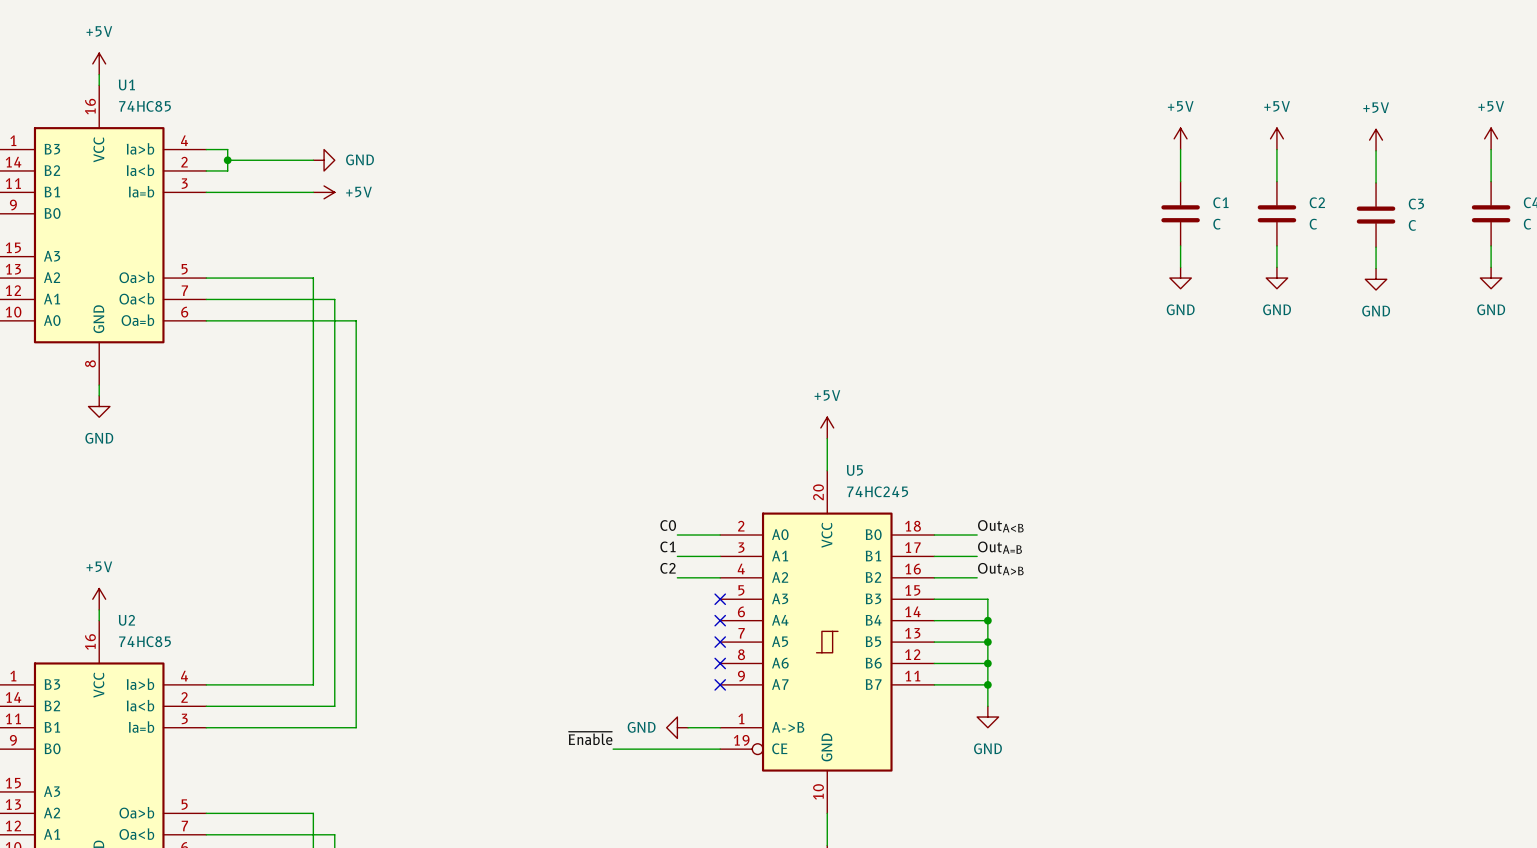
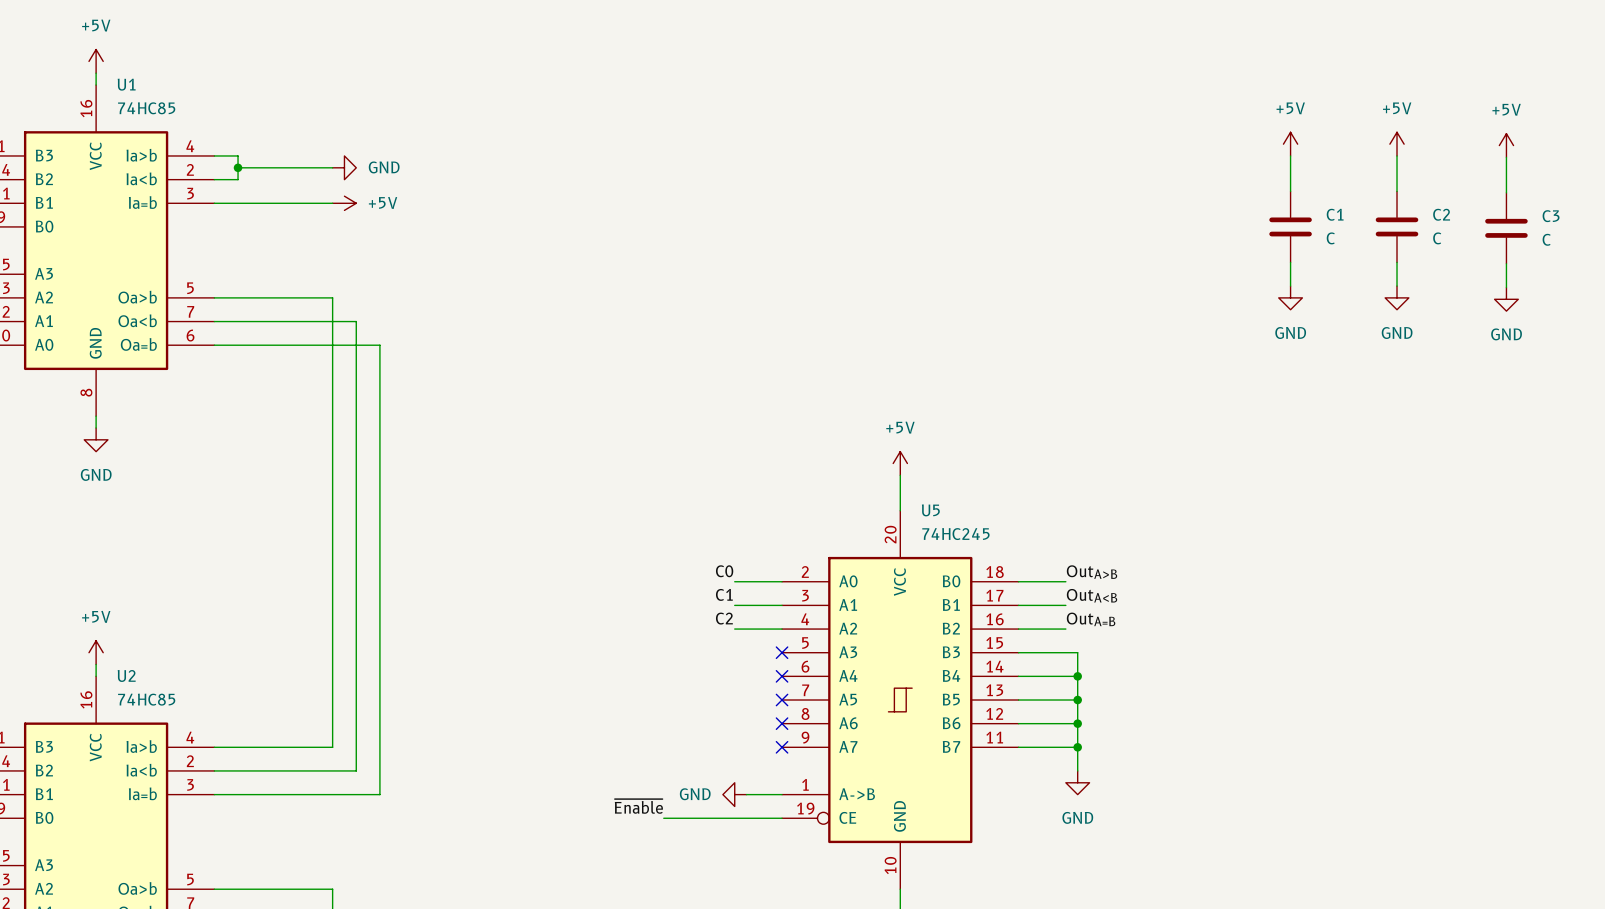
label: OutA<B (1000, 526) -> OutA>B (1092, 572)
label: OutA=B (999, 547) -> OutA<B (1092, 595)
label: OutA>B (1000, 569) -> OutA=B (1091, 619)

